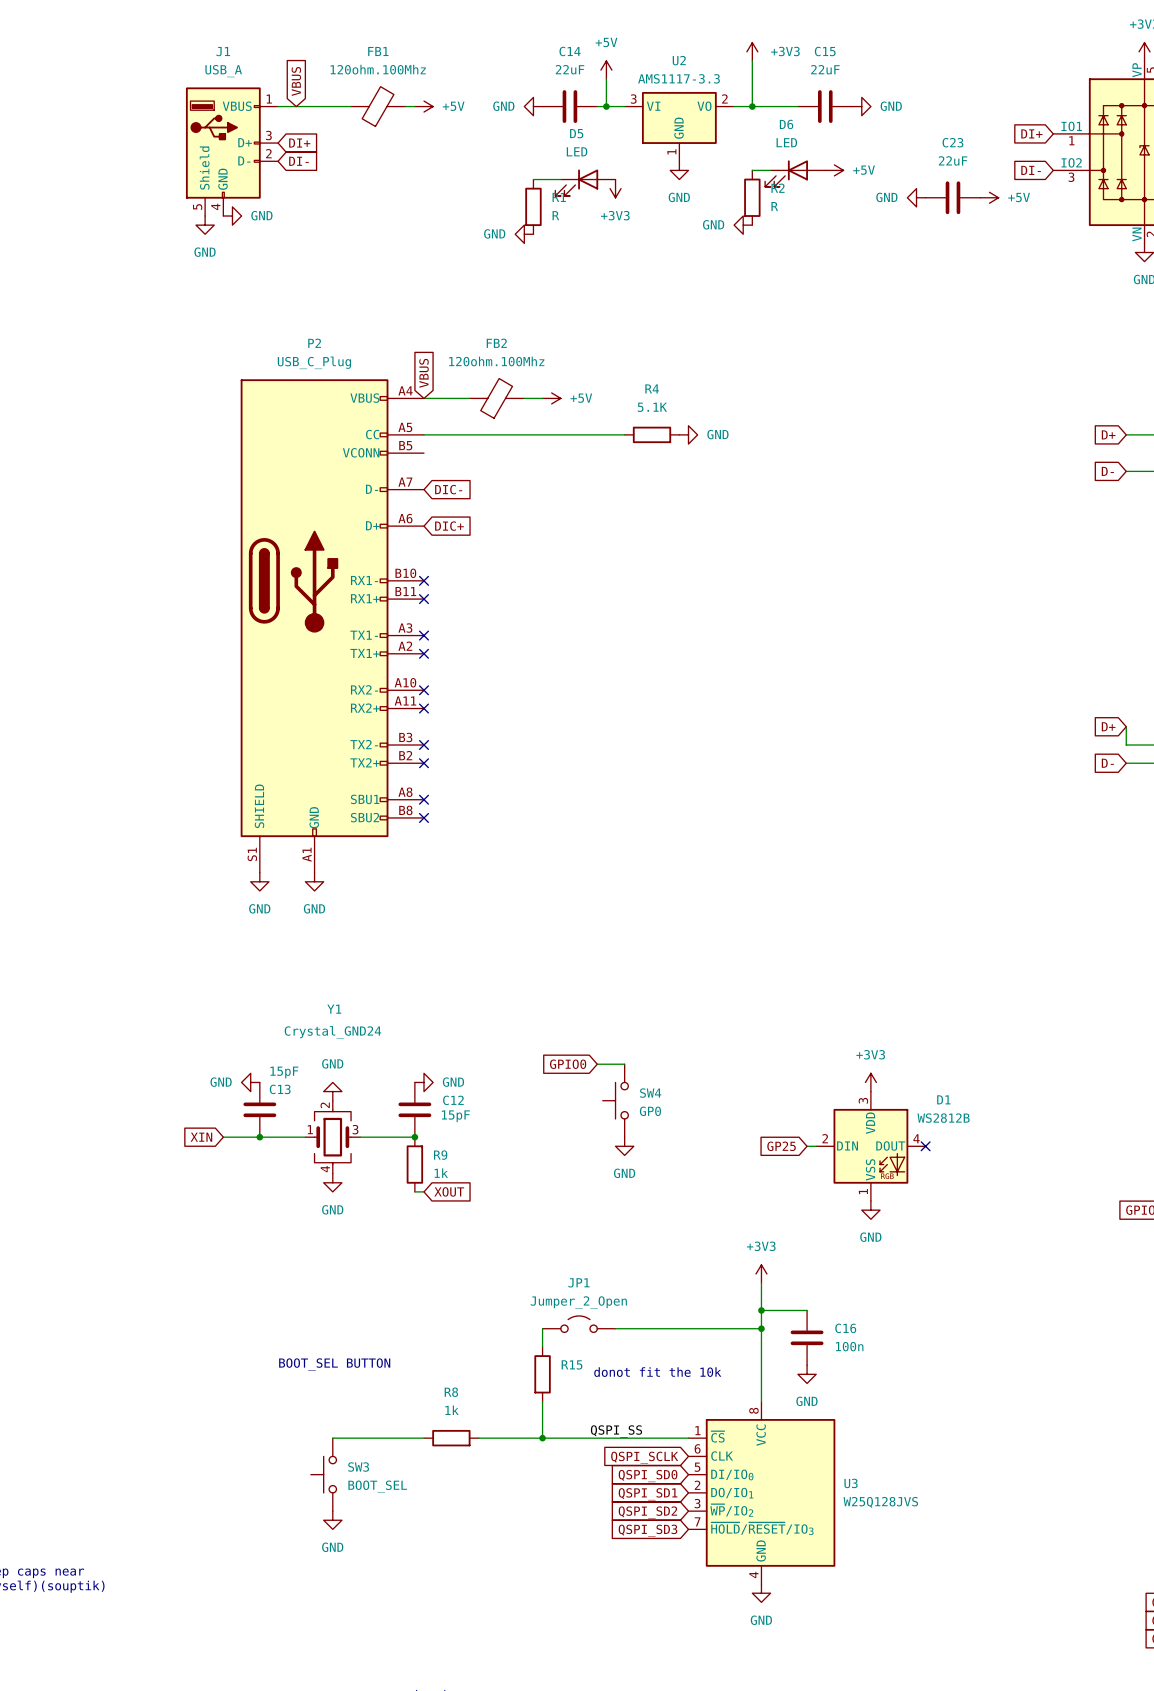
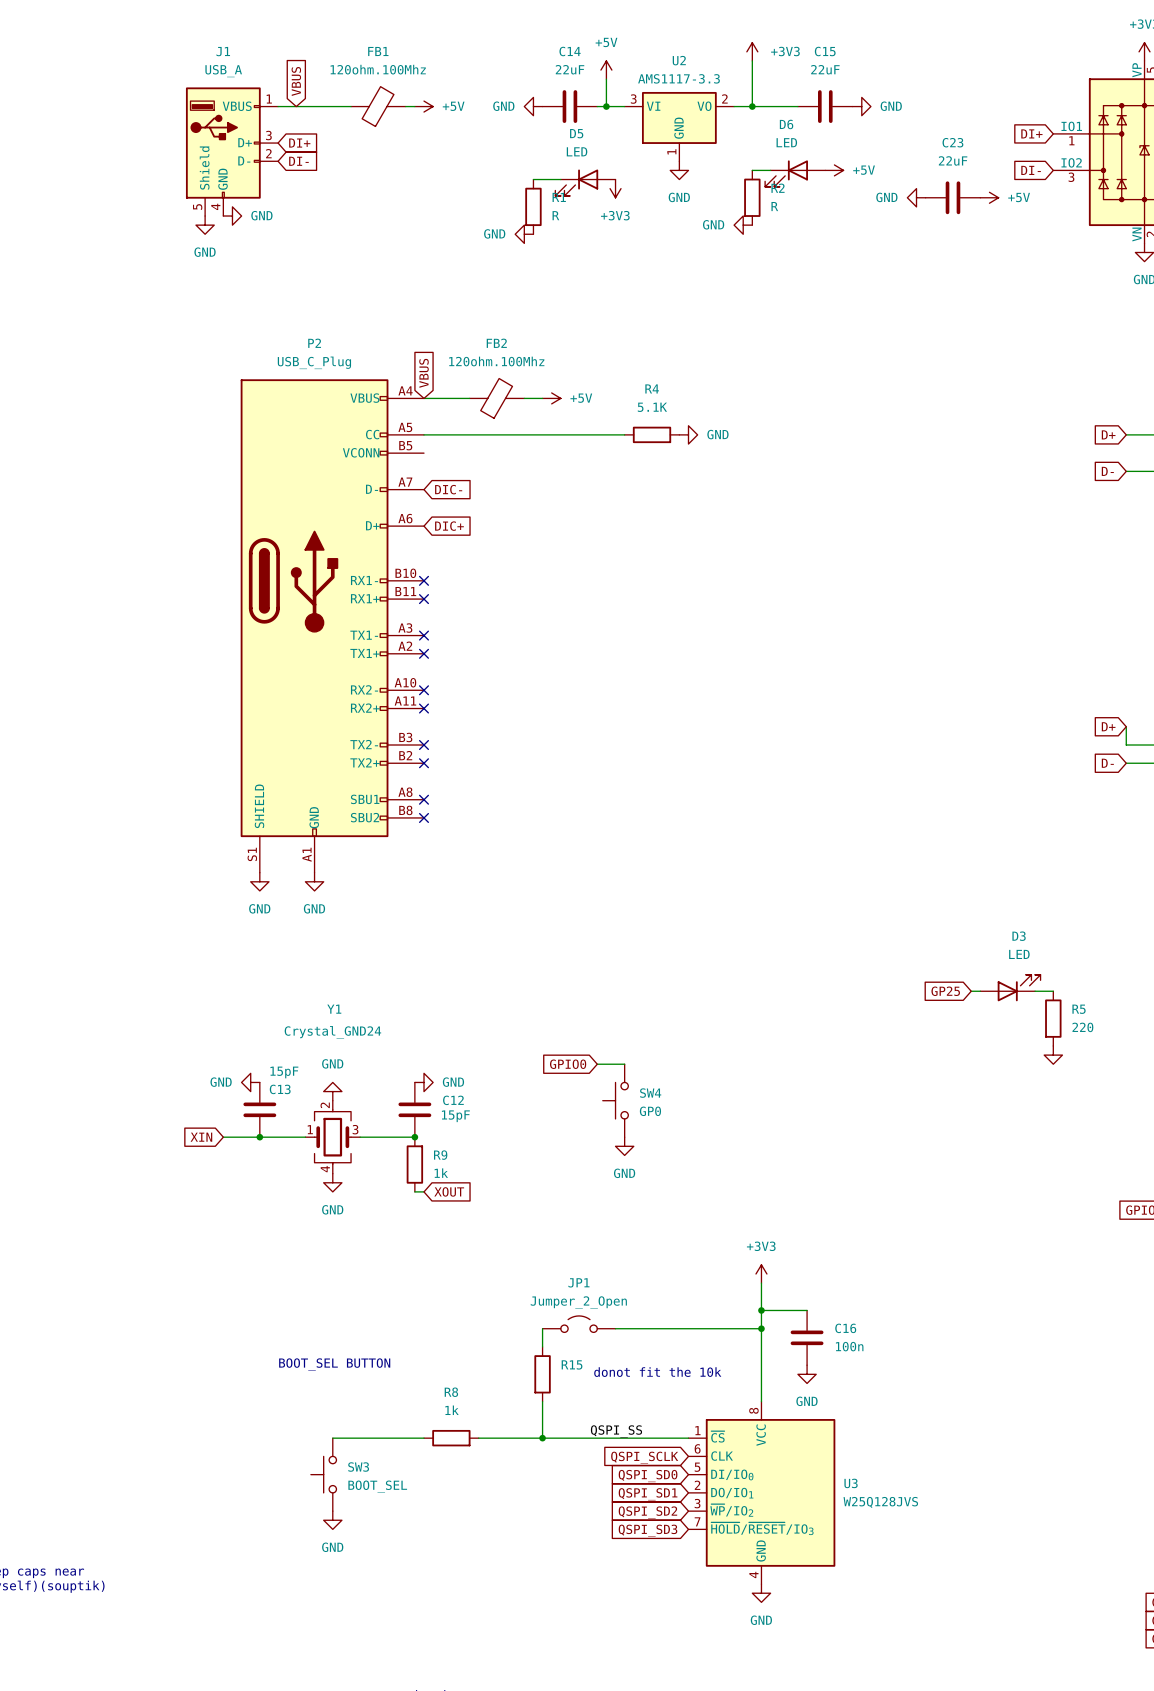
D3: none -> LED (1010, 988)
global label: none -> GP25 (945, 991)
wire: none -> (971, 991) (980, 991)
wire: none -> (1035, 991) (1053, 991)
R5: none -> 220 (1053, 1018)
power symbol: none -> (1053, 1055)
power symbol: +3V3 (870, 1082) -> none
global label: GP25 (781, 1146) -> none
wire: (807, 1146) (816, 1146) -> none
D1: WS2812B (870, 1146) -> none
no-connect mark: (925, 1146) -> none
power symbol: GND (870, 1210) -> none

